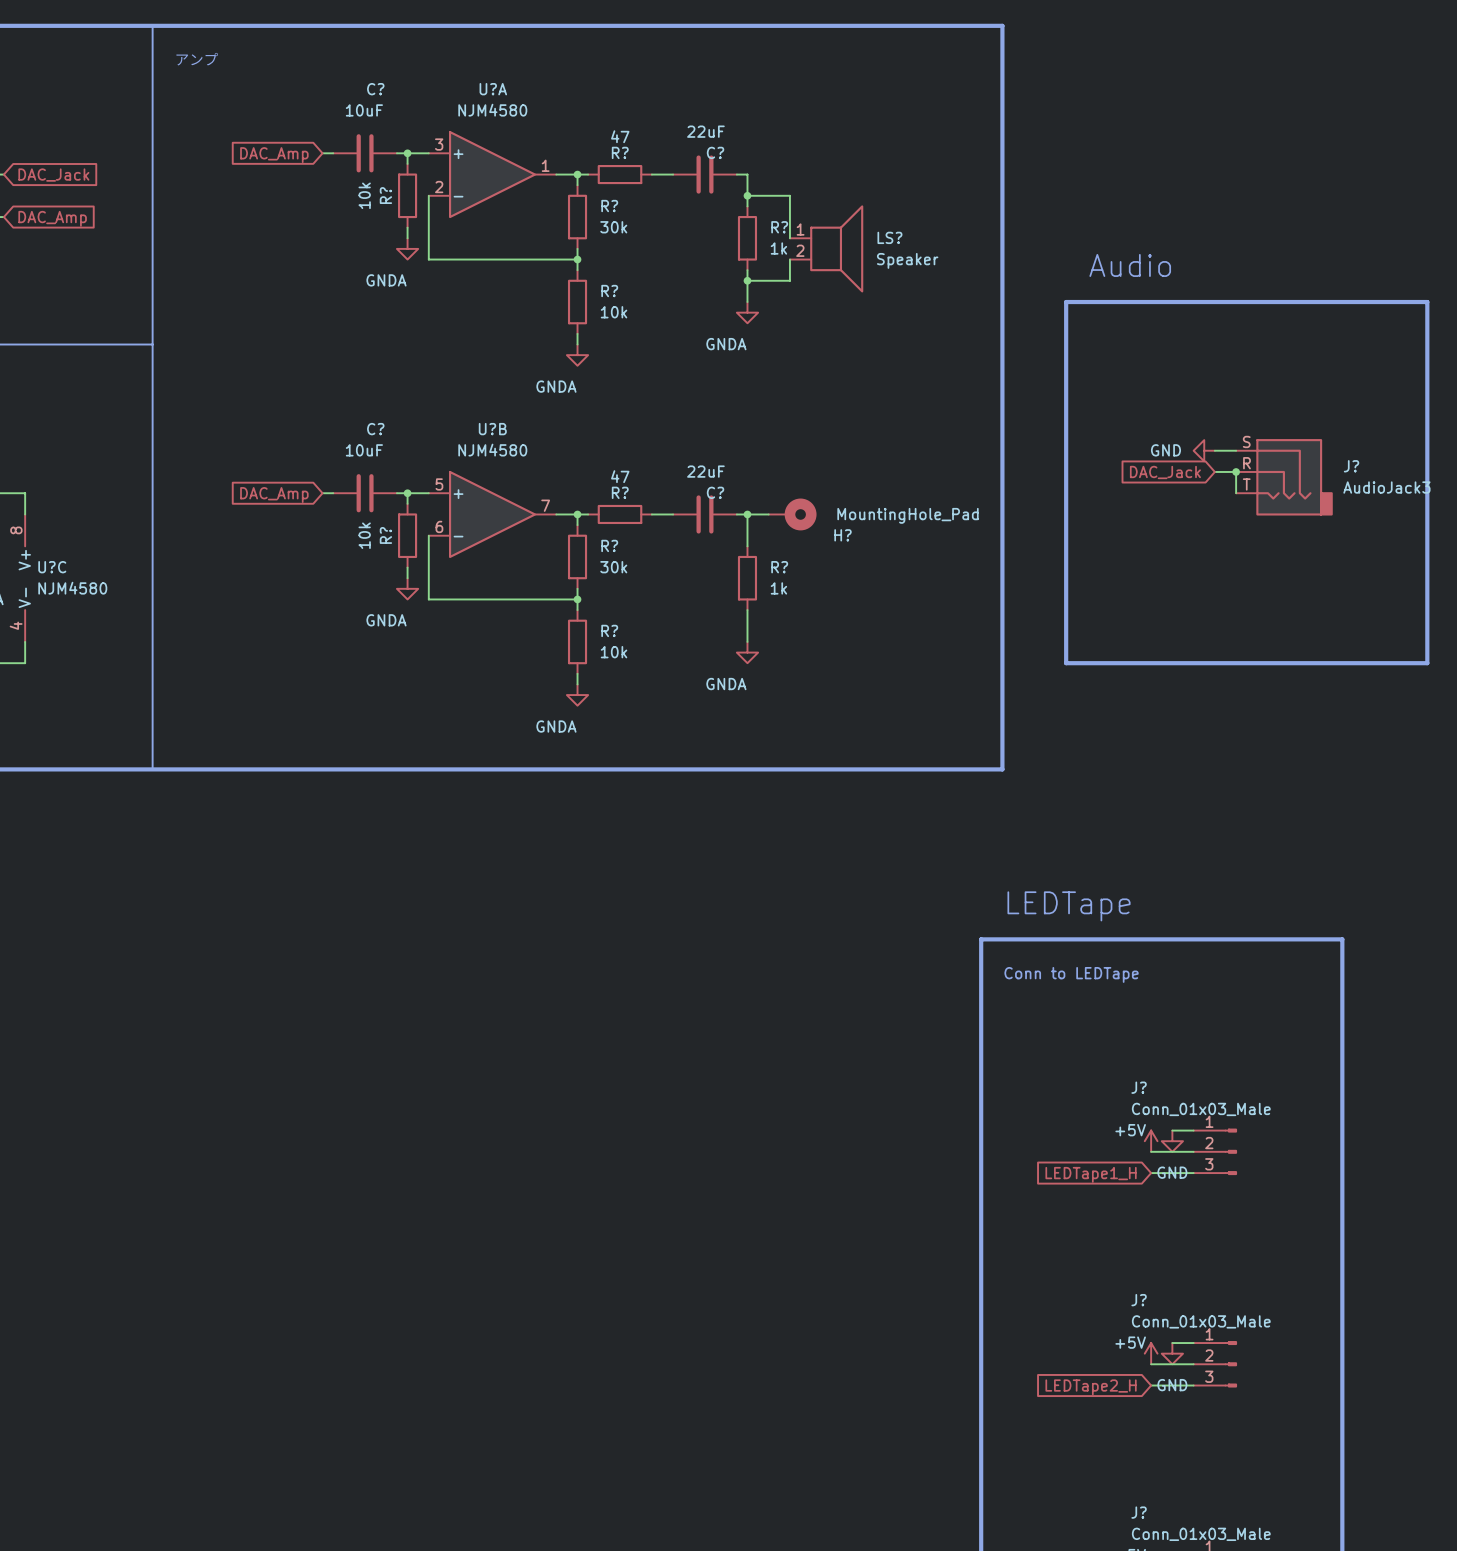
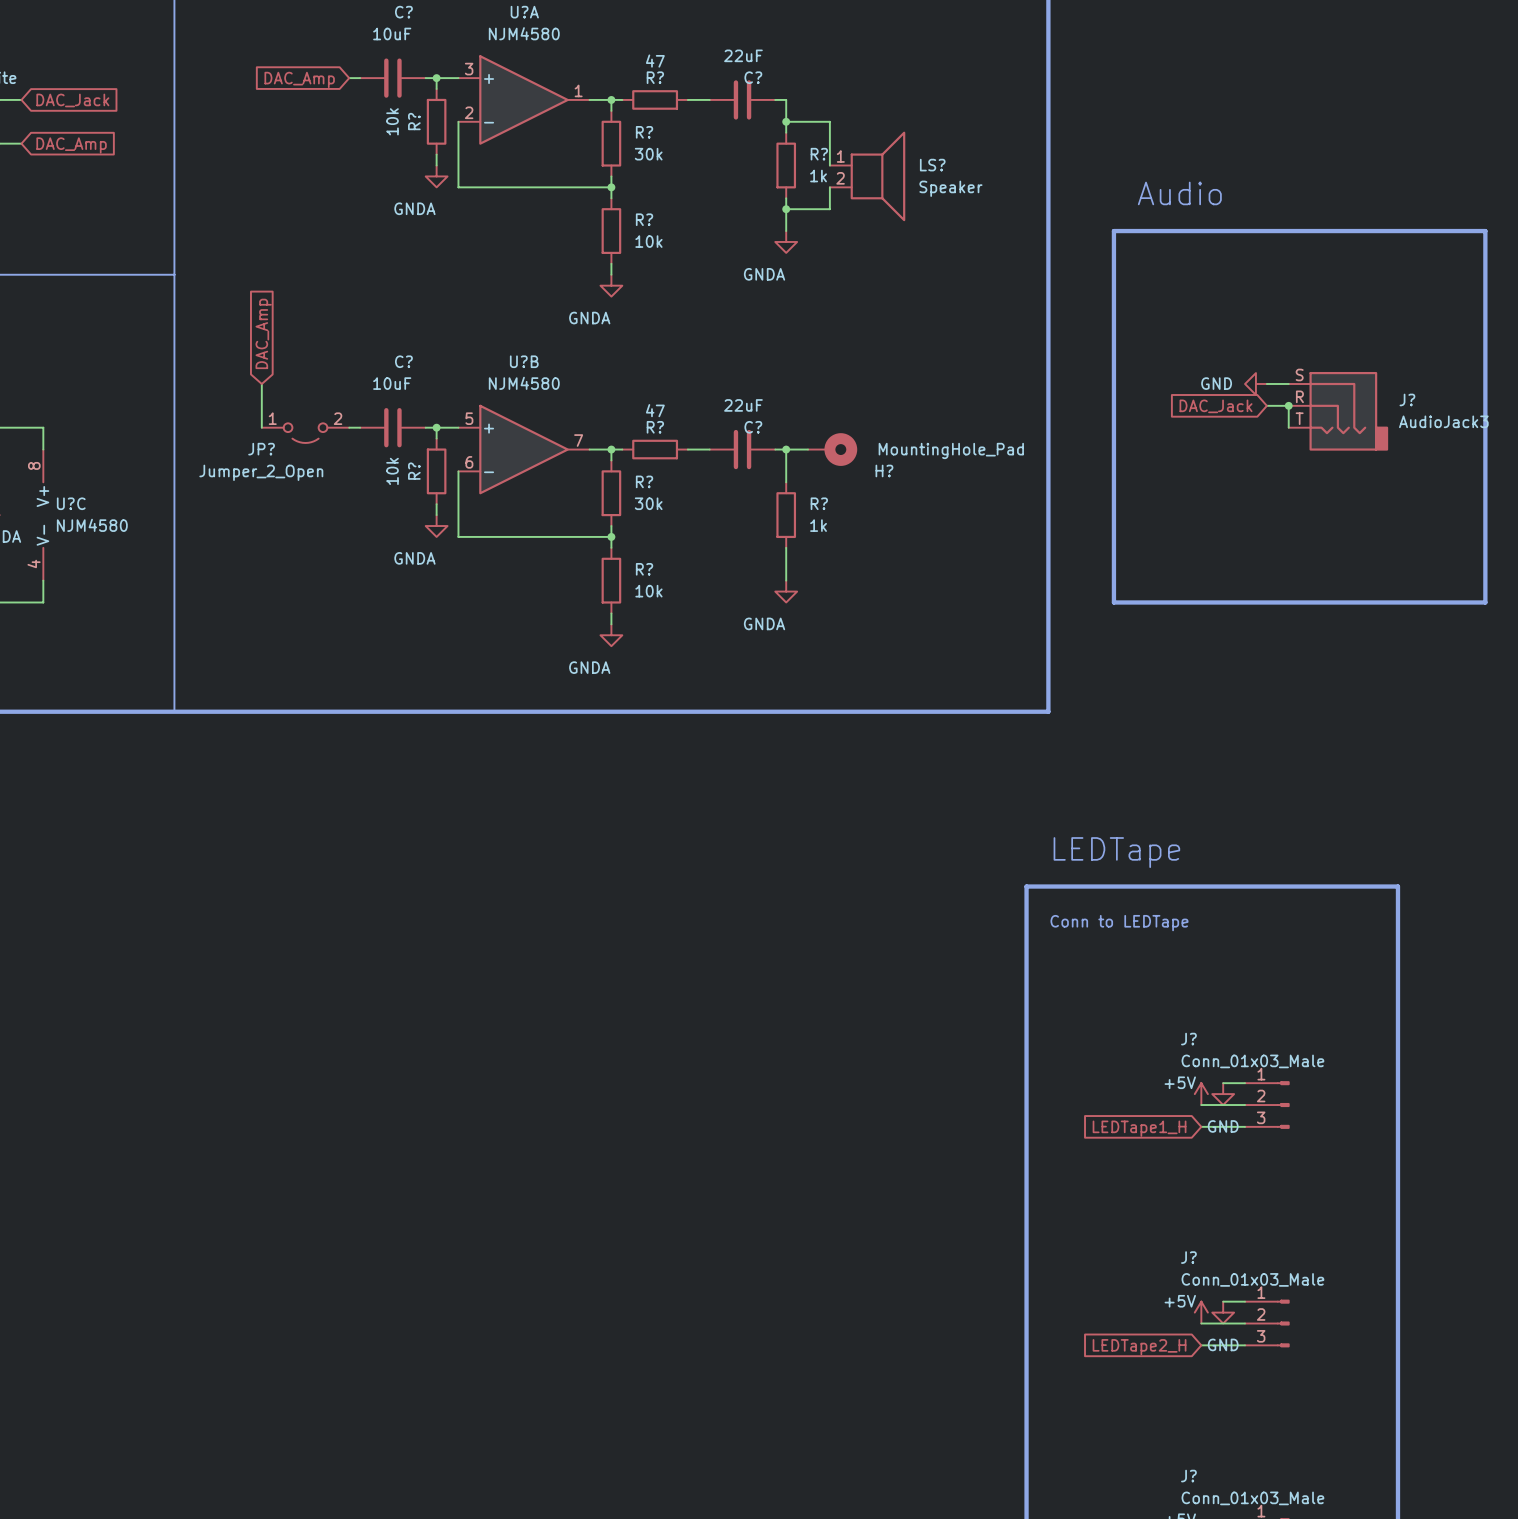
wire: none -> (261, 383) (261, 427)
global label rotation: 0° (274, 495) -> 90° clockwise (263, 333)
JP?: none -> Jumper_2_Open (305, 433)

